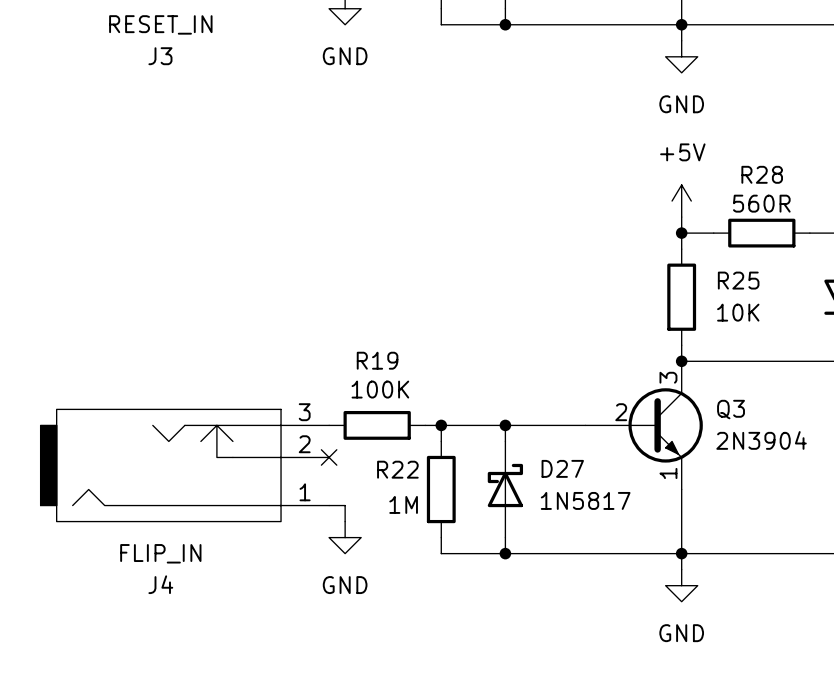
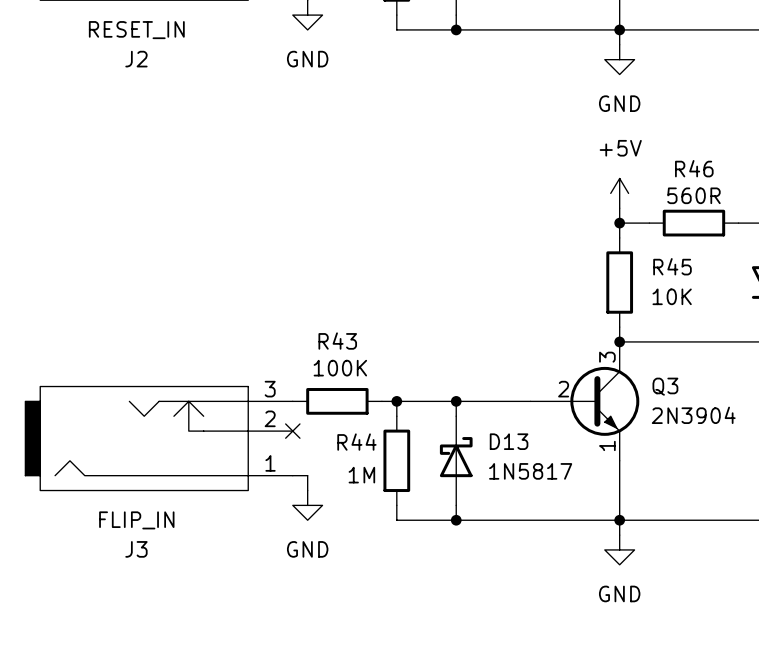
J3 name: J3 (160, 56) -> J2 (136, 59)
R28 name: R28 (762, 174) -> R46 (694, 168)
R25 name: R25 (738, 280) -> R45 (672, 266)
R19 name: R19 (377, 360) -> R43 (337, 341)
D27 name: D27 (562, 468) -> D13 (509, 441)
R22 name: R22 (397, 469) -> R44 (356, 442)
J4 name: J4 (160, 584) -> J3 (136, 549)

